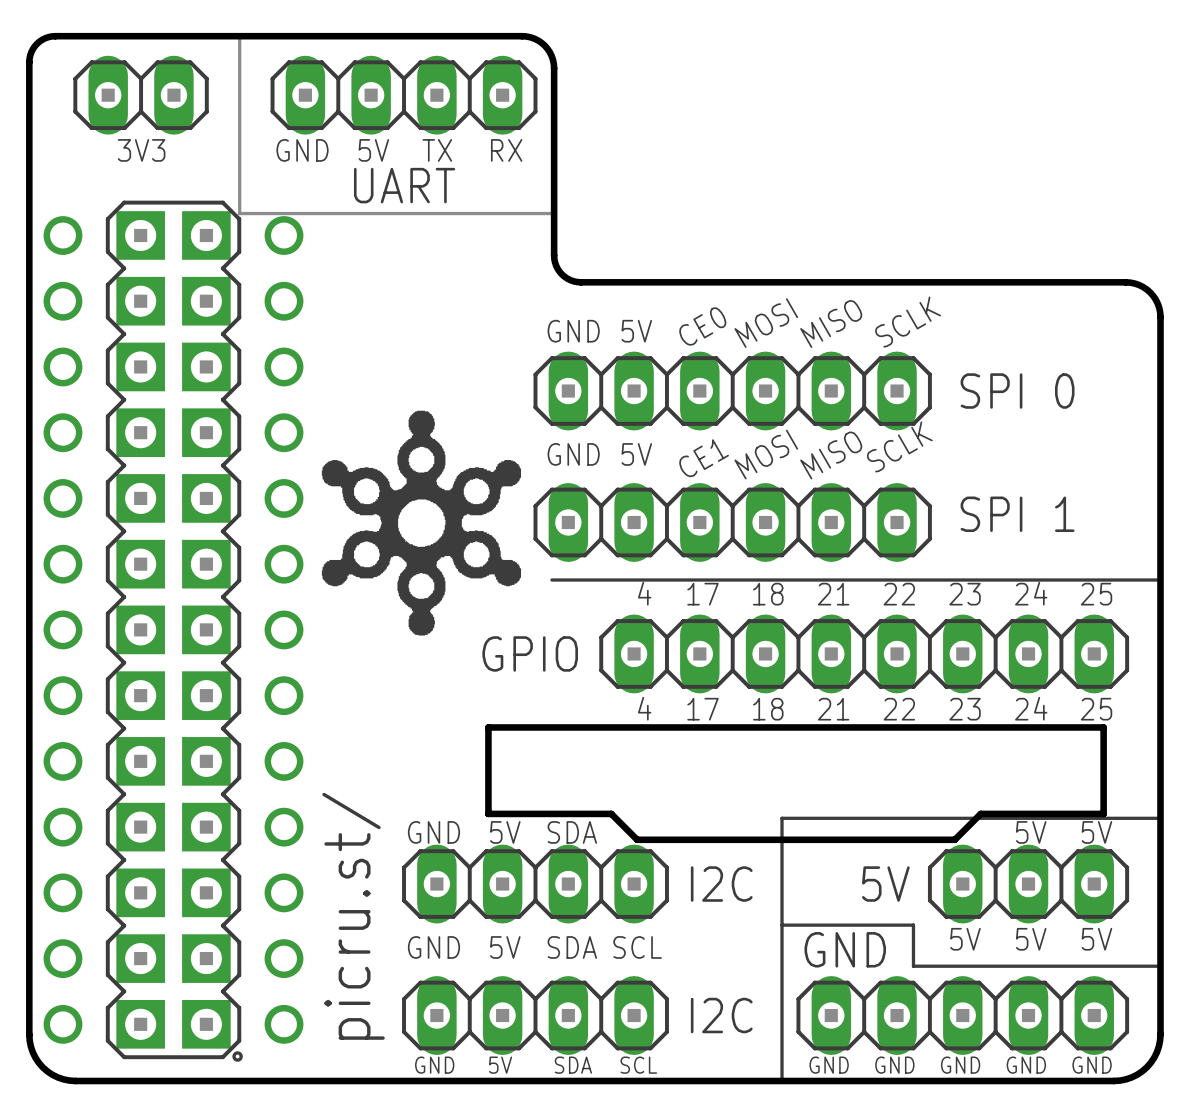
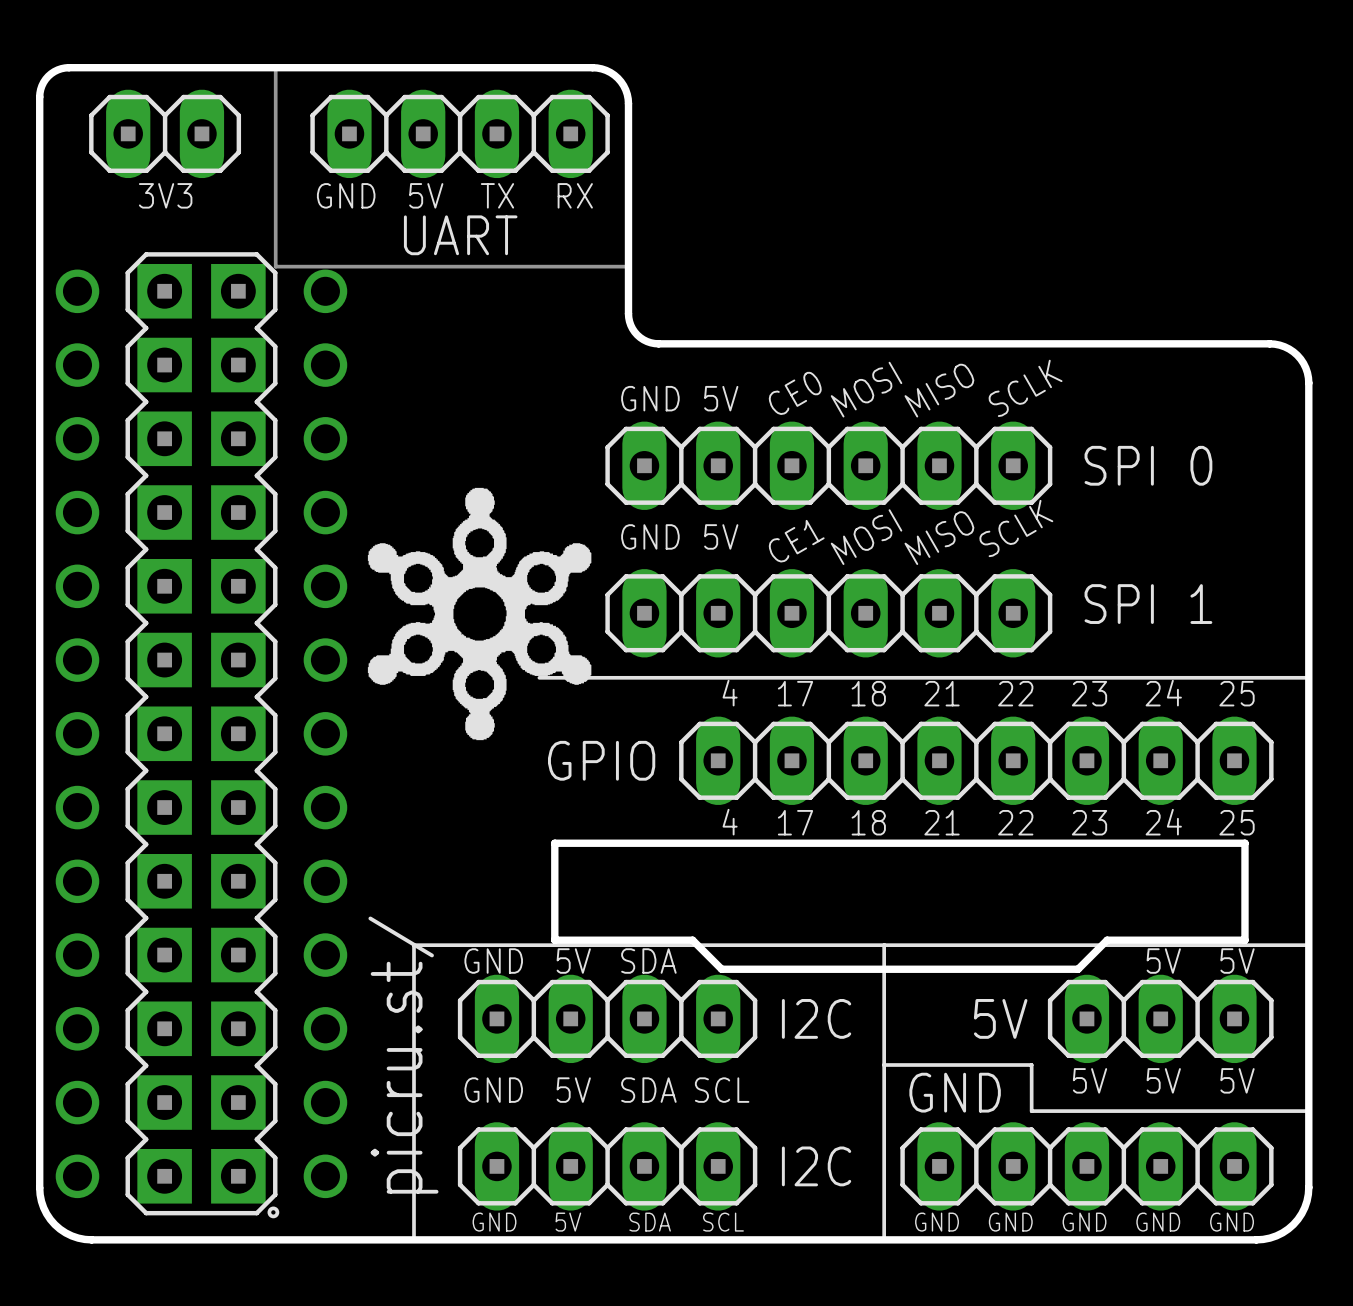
line: none -> (539, 677) (626, 677)
line: none -> (884, 945) (413, 945) (413, 1240)

